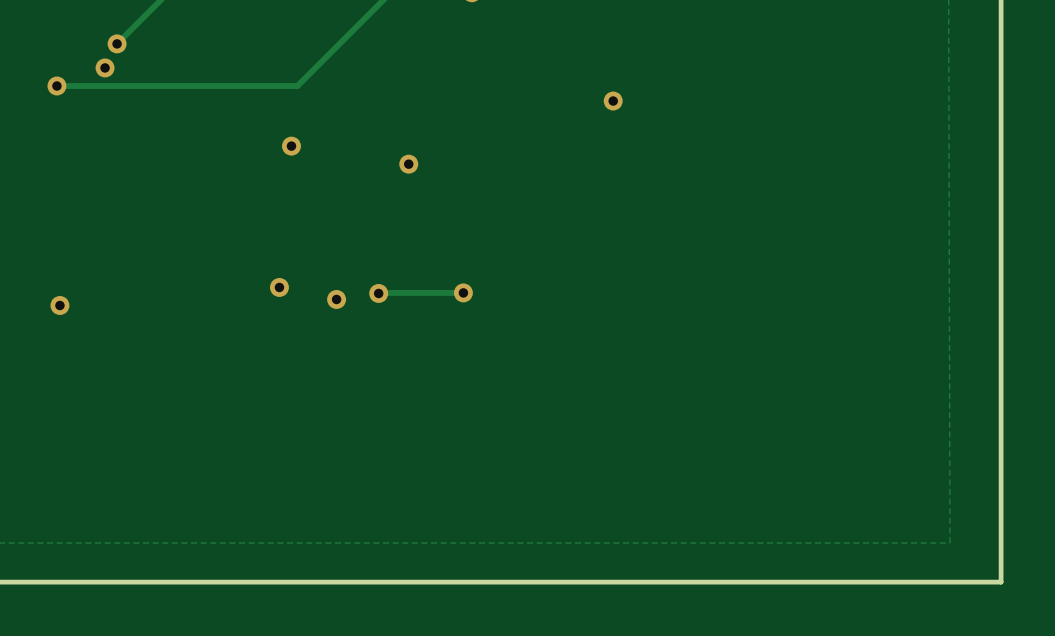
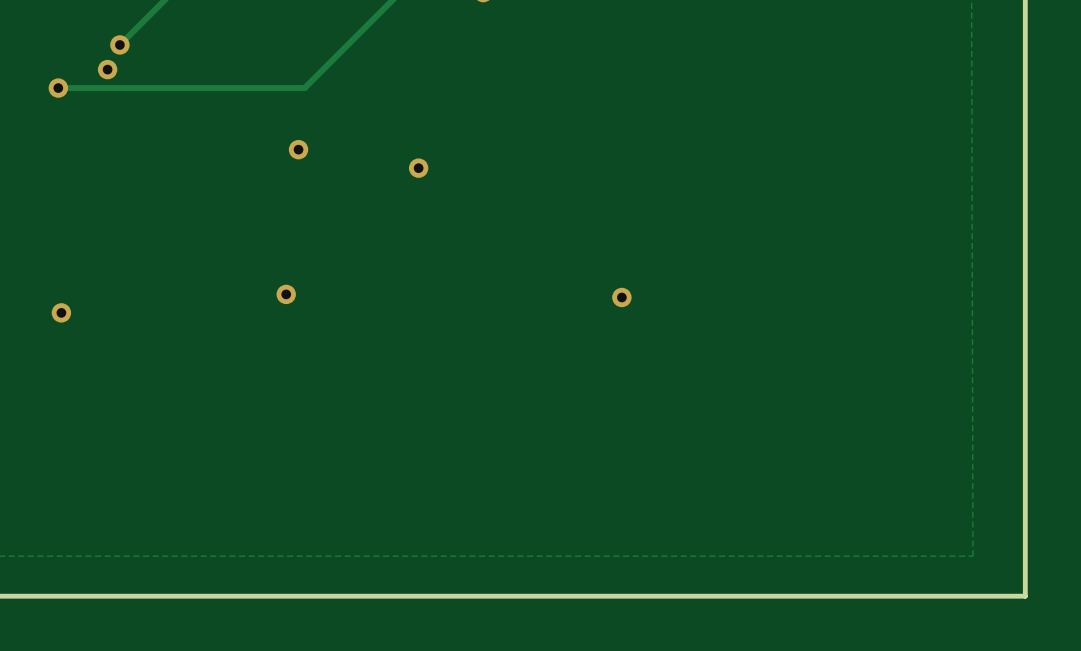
via: (613, 101) -> none
via: none -> (621, 297)
track: (463, 292) (378, 293) -> none
via: (463, 292) -> none
via: (378, 293) -> none
via: (336, 299) -> none

